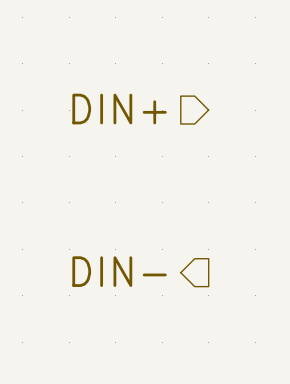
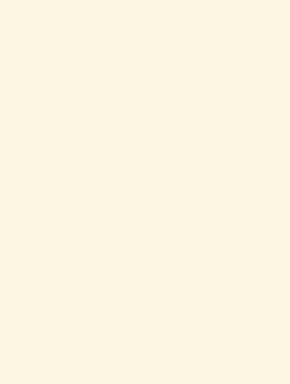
hierarchical label: DIN+ (119, 109) -> none
hierarchical label: DIN- (119, 271) -> none

